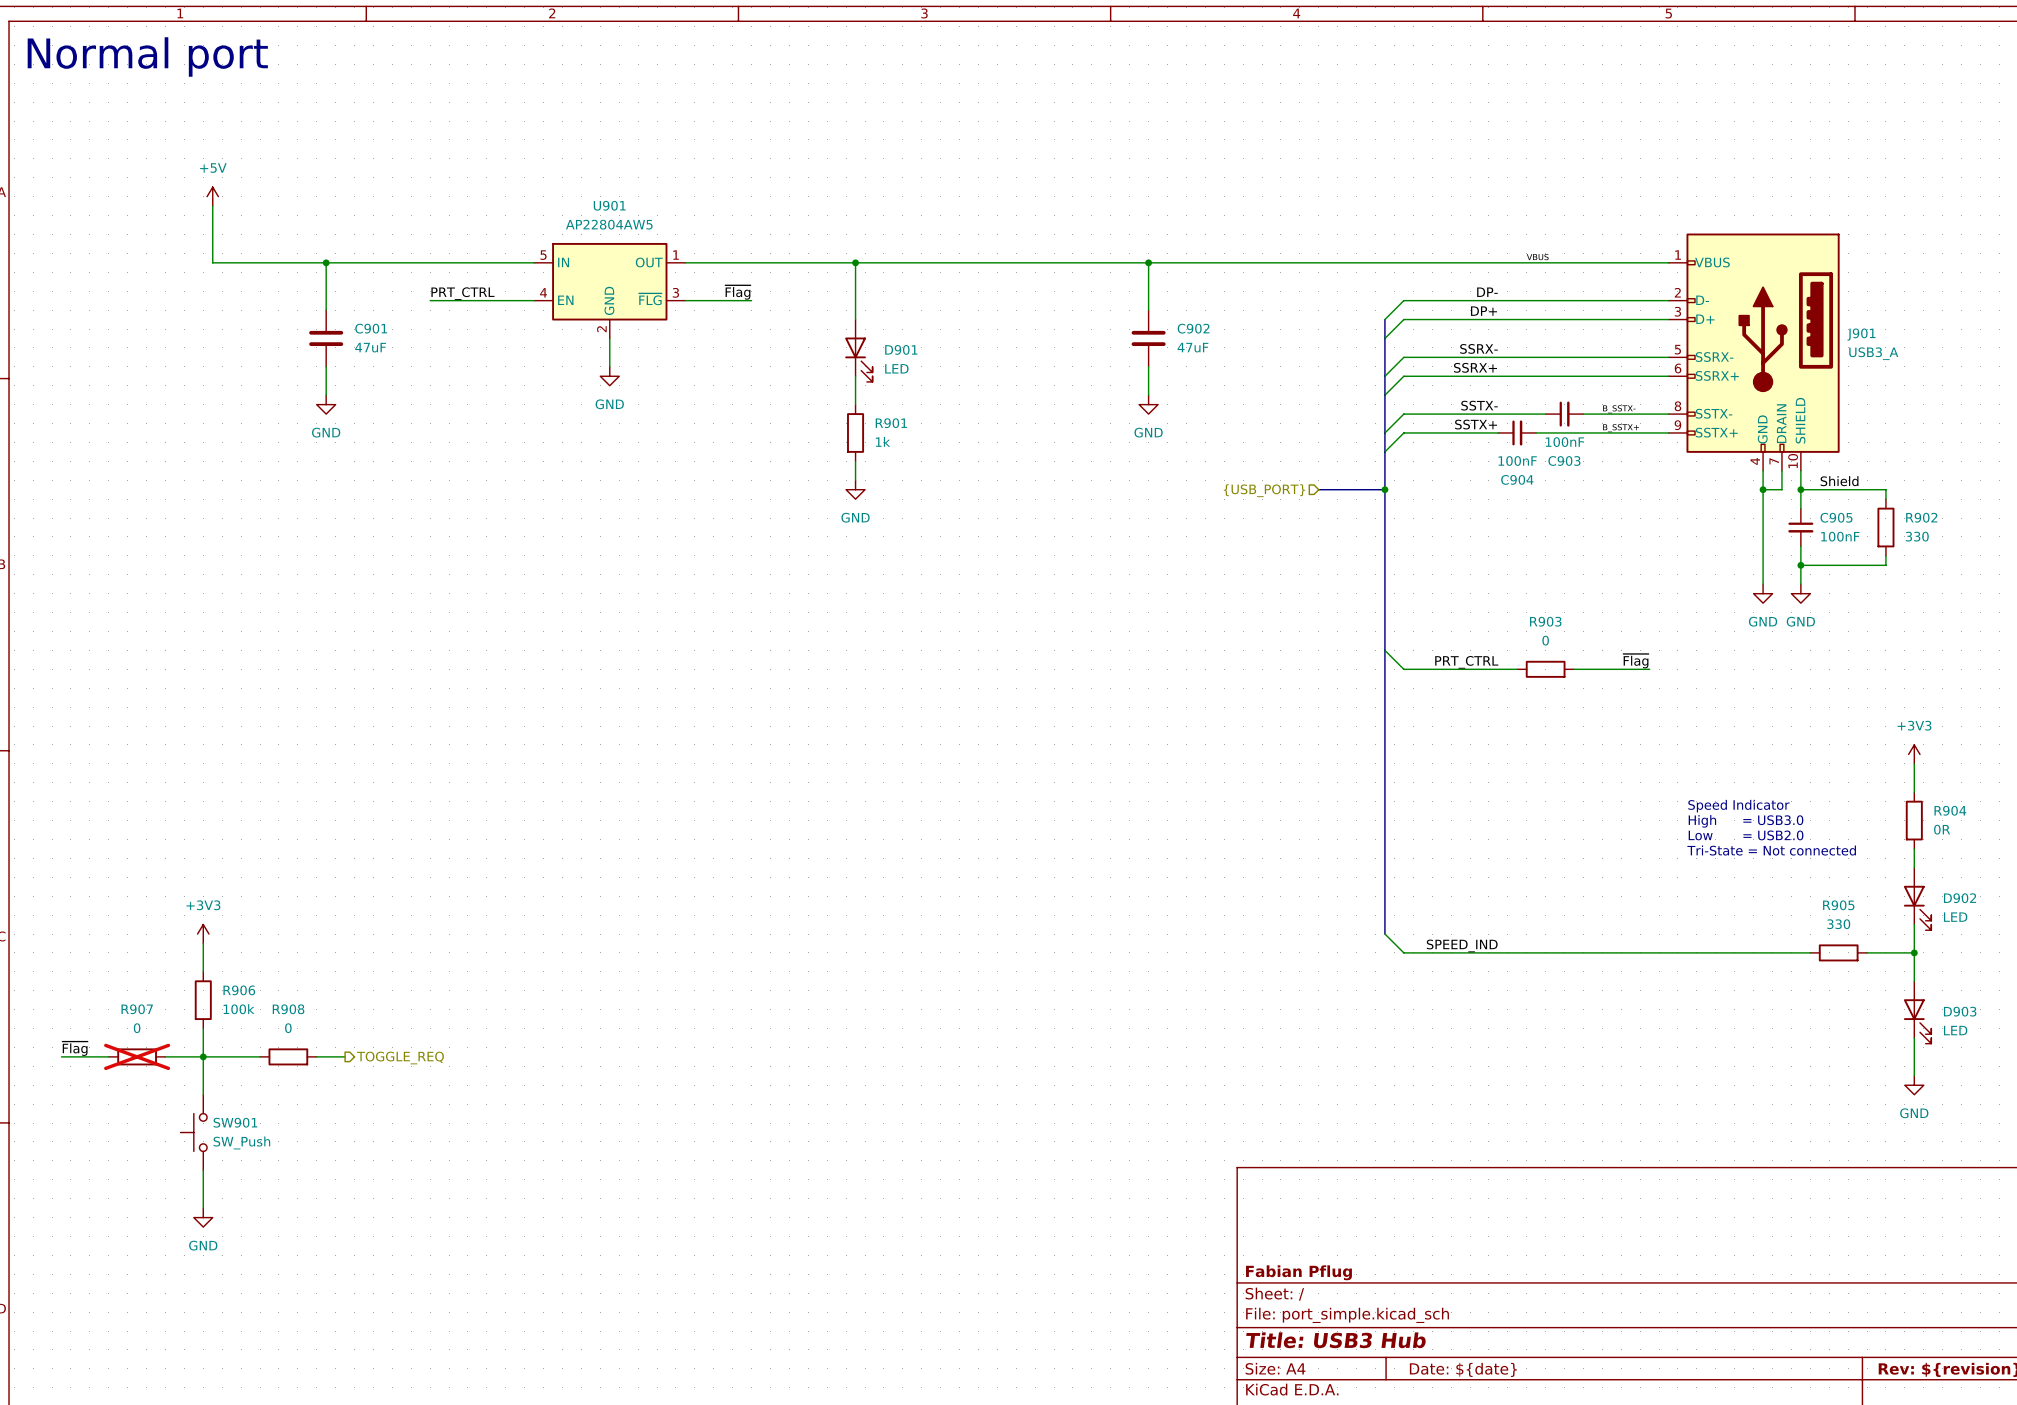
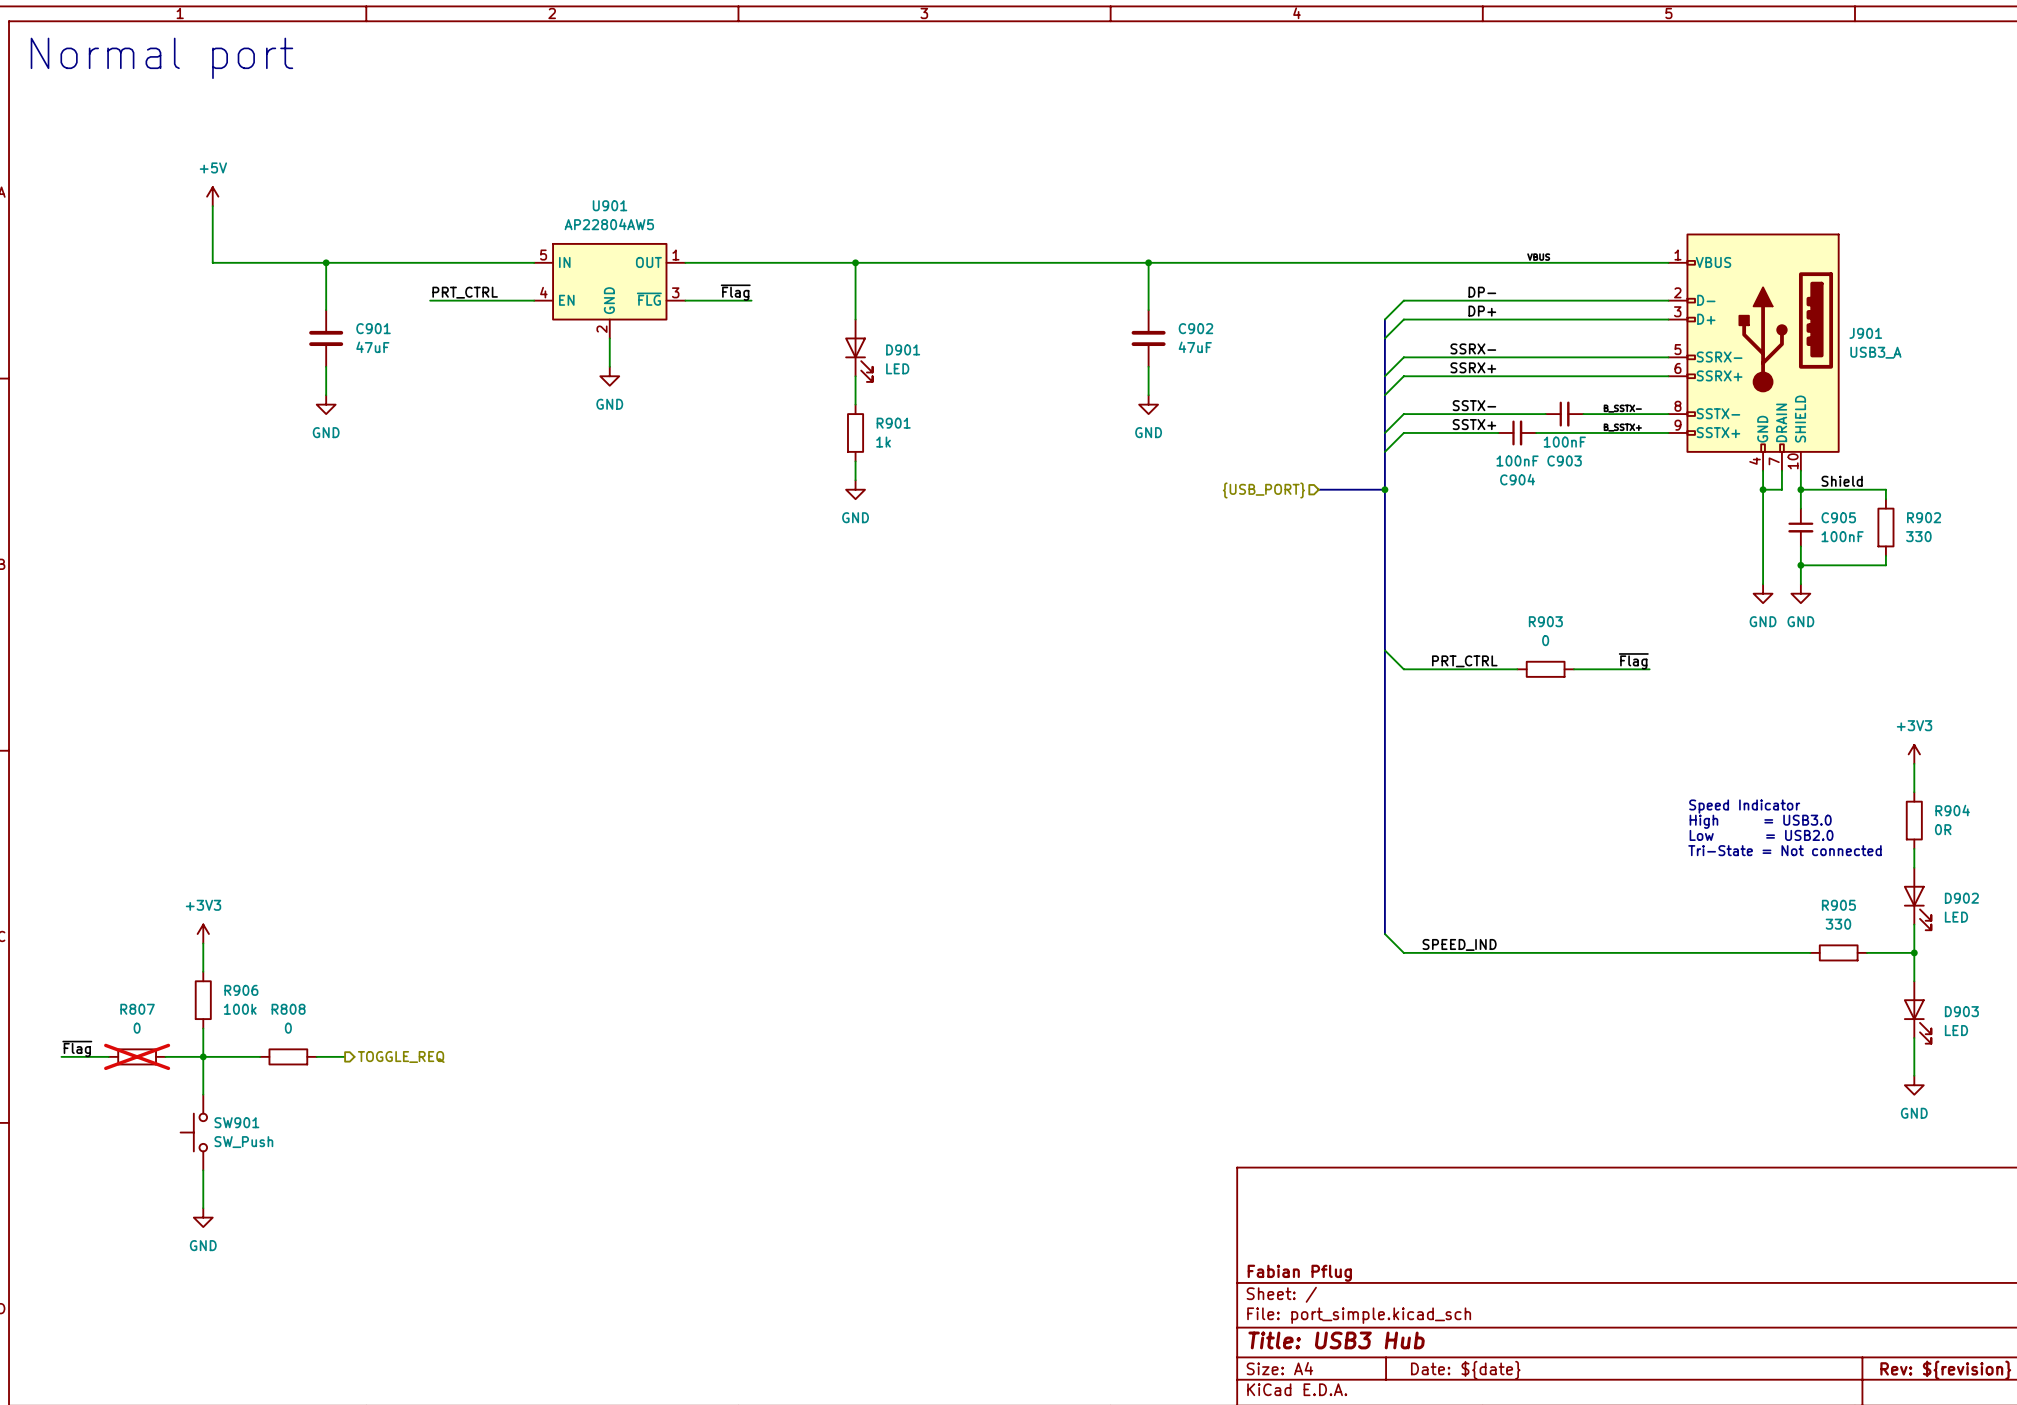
R907 name: R907 (137, 1009) -> R807 (137, 1009)
R908 name: R908 (288, 1009) -> R808 (288, 1009)

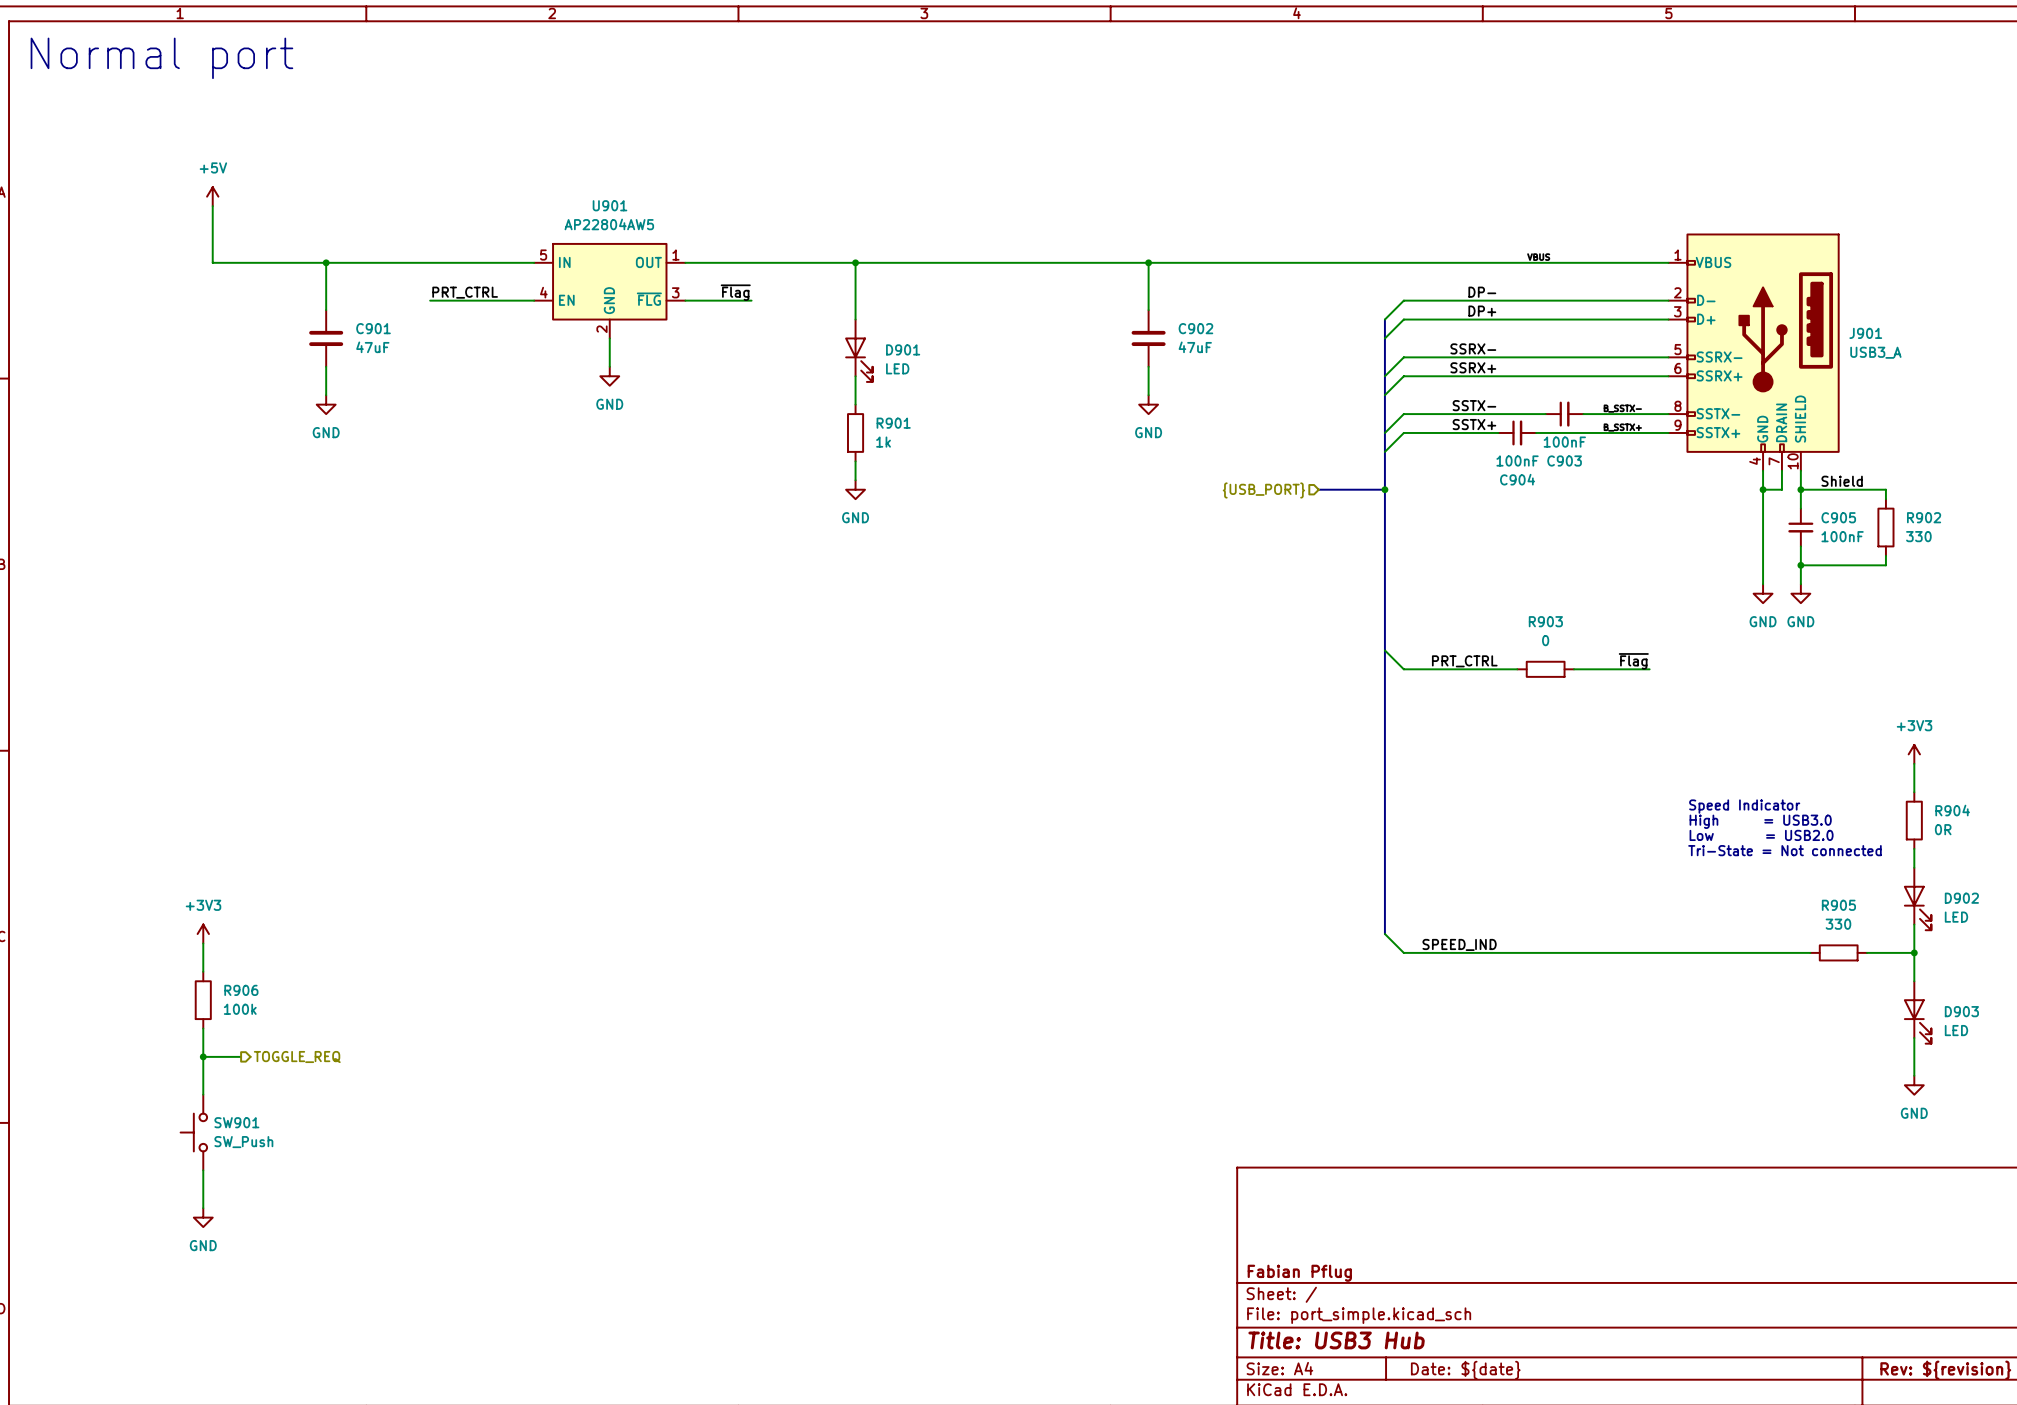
label: ~{Flag} (77, 1048) -> none
wire: (61, 1056) (108, 1056) -> none
R807: 0 (137, 1056) -> none
wire: (165, 1056) (203, 1056) -> none
wire: (241, 1056) (260, 1056) -> none
R808: 0 (288, 1056) -> none
wire: (316, 1056) (345, 1056) -> none
hierarchical label position: TOGGLE_REQ (401, 1056) -> TOGGLE_REQ (297, 1056)

